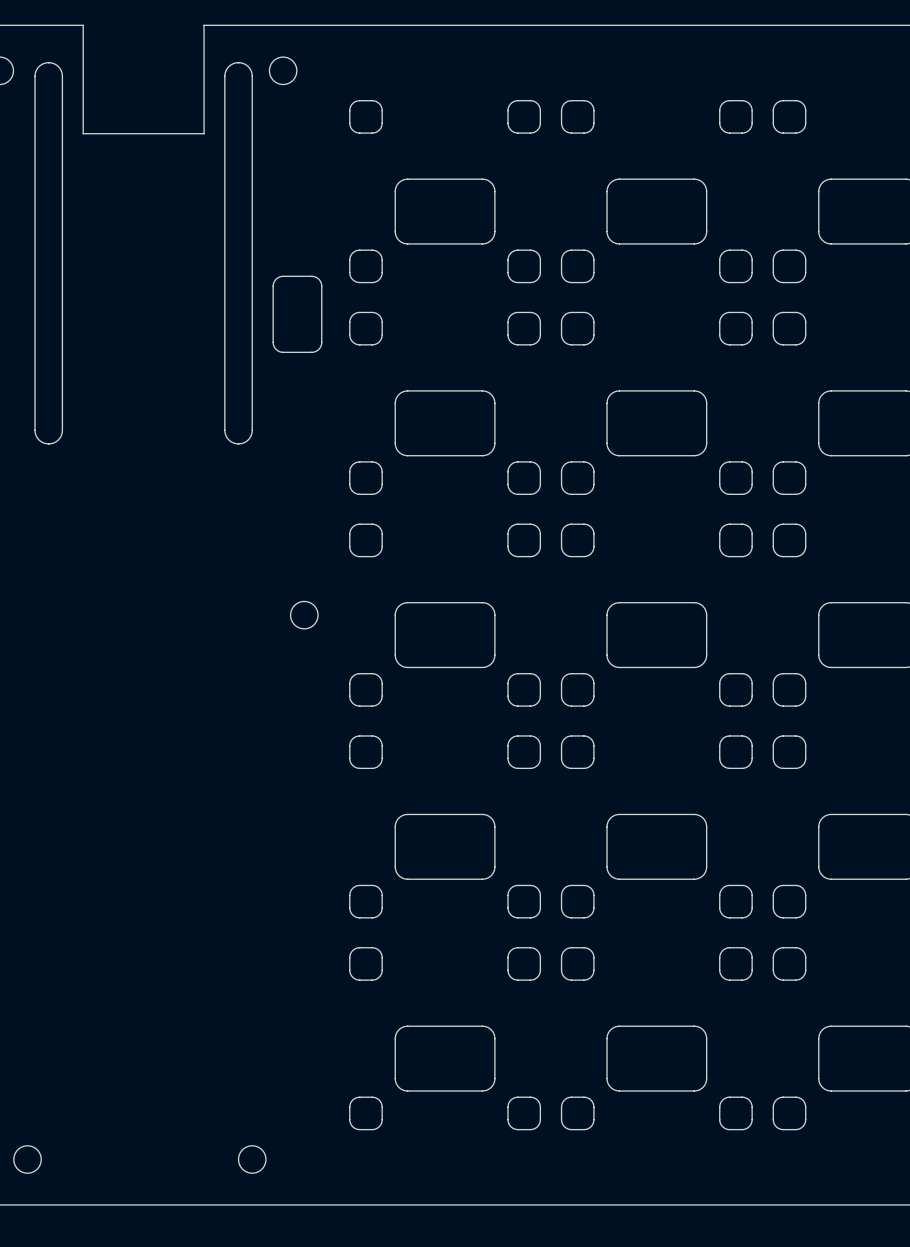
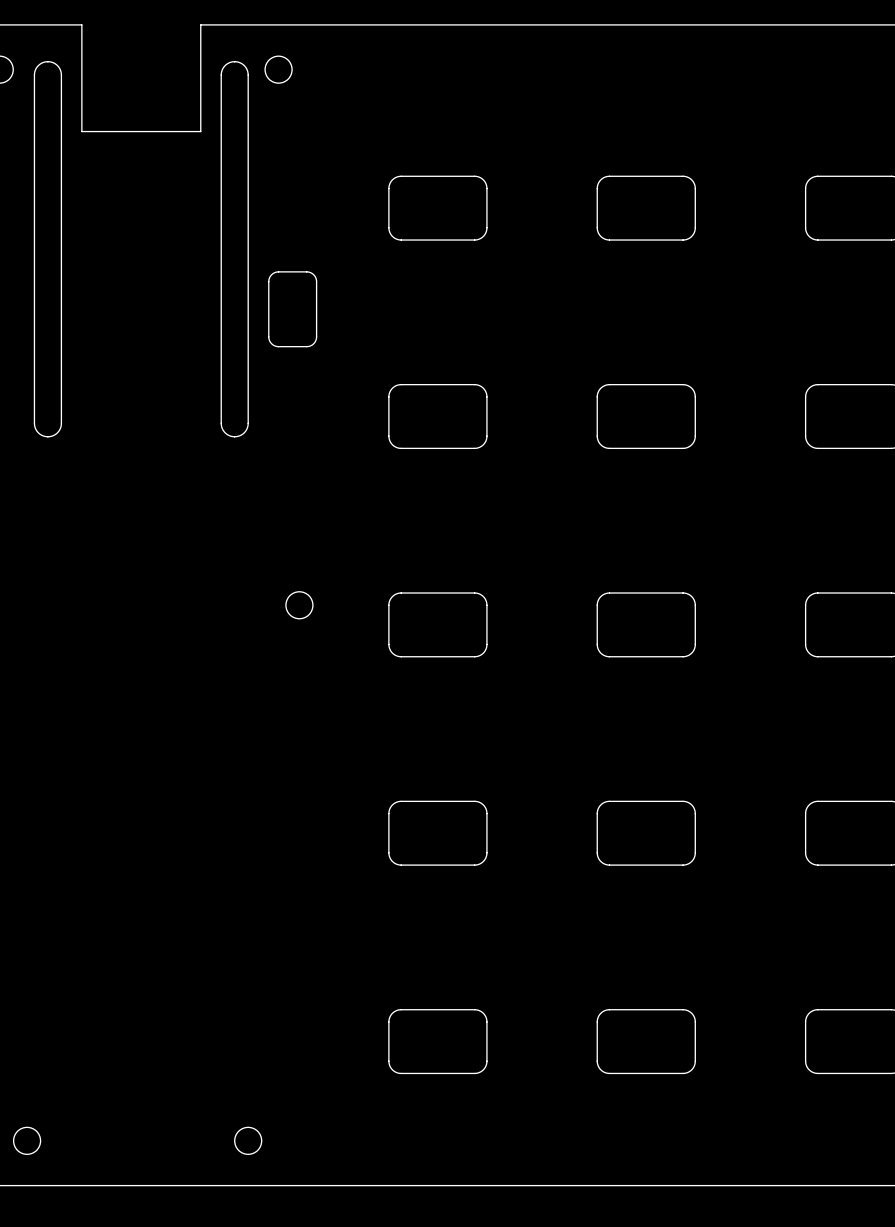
board edge: (359, 100) (374, 101) (380, 105) (382, 124) (377, 131) (358, 132) (351, 128) (350, 108) (353, 102) (359, 100) -> none
board edge: (517, 100) (532, 101) (539, 105) (540, 124) (535, 131) (516, 132) (509, 128) (508, 107) (512, 102) (517, 100) -> none
board edge: (571, 100) (586, 101) (592, 105) (593, 124) (588, 131) (570, 132) (562, 128) (561, 108) (565, 102) (571, 100) -> none
board edge: (729, 100) (744, 101) (750, 105) (752, 124) (747, 131) (728, 132) (721, 128) (720, 107) (723, 102) (729, 100) -> none
board edge: (783, 100) (798, 101) (804, 105) (805, 124) (800, 131) (781, 132) (774, 128) (773, 108) (777, 102) (783, 100) -> none
board edge: (359, 250) (374, 250) (380, 255) (382, 273) (377, 281) (358, 282) (351, 277) (350, 257) (353, 252) (359, 250) -> none
board edge: (517, 250) (532, 250) (539, 255) (540, 273) (535, 281) (516, 282) (509, 277) (508, 256) (512, 251) (517, 250) -> none
board edge: (571, 250) (586, 250) (592, 255) (593, 273) (588, 281) (570, 282) (562, 277) (561, 257) (565, 252) (571, 250) -> none
board edge: (729, 250) (744, 250) (750, 255) (752, 273) (747, 281) (728, 282) (721, 277) (720, 256) (723, 252) (729, 250) -> none
board edge: (783, 250) (798, 250) (804, 255) (805, 273) (800, 281) (781, 282) (774, 277) (773, 257) (777, 252) (783, 250) -> none
board edge: (359, 312) (374, 312) (380, 317) (382, 336) (377, 343) (358, 344) (351, 339) (350, 319) (353, 314) (359, 312) -> none
board edge: (517, 312) (532, 312) (539, 317) (540, 336) (535, 343) (516, 344) (509, 339) (508, 319) (512, 313) (517, 312) -> none
board edge: (571, 312) (586, 312) (592, 317) (593, 336) (588, 343) (570, 344) (562, 339) (561, 319) (565, 314) (571, 312) -> none
board edge: (729, 312) (744, 312) (750, 317) (752, 336) (747, 343) (728, 344) (721, 339) (720, 319) (724, 313) (729, 312) -> none
board edge: (783, 312) (798, 312) (804, 317) (805, 336) (800, 343) (781, 344) (774, 339) (773, 319) (777, 314) (783, 312) -> none
board edge: (359, 461) (374, 462) (380, 466) (382, 485) (377, 492) (358, 494) (351, 489) (350, 469) (353, 463) (359, 461) -> none
board edge: (517, 461) (532, 462) (539, 466) (540, 485) (535, 492) (516, 494) (509, 489) (508, 468) (512, 463) (517, 461) -> none
board edge: (571, 461) (586, 462) (592, 466) (593, 485) (588, 492) (570, 494) (563, 489) (561, 469) (565, 463) (571, 461) -> none
board edge: (729, 461) (744, 462) (750, 466) (752, 485) (747, 492) (728, 494) (721, 489) (720, 468) (724, 463) (729, 461) -> none
board edge: (783, 461) (798, 462) (804, 466) (805, 485) (800, 492) (782, 494) (774, 489) (773, 469) (777, 463) (783, 461) -> none
board edge: (359, 524) (374, 524) (380, 529) (382, 547) (377, 555) (358, 556) (351, 551) (350, 531) (353, 526) (359, 524) -> none
board edge: (517, 524) (532, 524) (539, 529) (540, 547) (535, 555) (516, 556) (509, 551) (508, 530) (512, 525) (517, 524) -> none
board edge: (571, 524) (586, 524) (592, 529) (593, 547) (588, 555) (570, 556) (563, 551) (561, 531) (565, 526) (571, 524) -> none
board edge: (729, 524) (744, 524) (750, 529) (752, 547) (747, 555) (728, 556) (721, 551) (720, 530) (723, 526) (729, 524) -> none
board edge: (783, 524) (798, 524) (804, 529) (805, 547) (800, 555) (782, 556) (774, 551) (773, 531) (777, 526) (783, 524) -> none
board edge: (359, 673) (374, 674) (380, 678) (382, 697) (377, 704) (358, 706) (351, 701) (350, 681) (353, 675) (359, 673) -> none
board edge: (517, 673) (532, 674) (539, 678) (540, 697) (535, 704) (516, 706) (509, 701) (508, 680) (511, 675) (517, 673) -> none
board edge: (571, 673) (586, 674) (592, 678) (593, 697) (588, 704) (570, 706) (563, 701) (561, 681) (565, 675) (571, 673) -> none
board edge: (729, 673) (744, 674) (750, 678) (752, 697) (747, 704) (728, 706) (721, 701) (720, 680) (723, 675) (729, 673) -> none
board edge: (783, 673) (798, 674) (804, 678) (805, 697) (800, 704) (782, 706) (774, 701) (773, 681) (777, 675) (783, 673) -> none
board edge: (359, 735) (374, 736) (380, 740) (382, 759) (377, 767) (358, 768) (351, 763) (350, 743) (353, 738) (359, 735) -> none
board edge: (517, 735) (532, 736) (539, 740) (540, 759) (535, 767) (516, 768) (509, 763) (508, 742) (512, 737) (517, 735) -> none
board edge: (571, 735) (586, 736) (592, 740) (593, 759) (588, 767) (570, 768) (563, 763) (561, 743) (565, 738) (571, 735) -> none
board edge: (729, 735) (744, 736) (750, 740) (752, 759) (747, 767) (728, 768) (721, 763) (720, 742) (724, 737) (729, 735) -> none
board edge: (783, 735) (798, 736) (804, 740) (805, 759) (800, 767) (782, 768) (774, 763) (773, 743) (777, 738) (783, 735) -> none
board edge: (359, 885) (374, 885) (380, 890) (382, 909) (377, 916) (358, 917) (351, 912) (350, 892) (353, 887) (359, 885) -> none
board edge: (517, 885) (532, 885) (539, 890) (540, 909) (535, 916) (516, 917) (509, 912) (508, 892) (512, 886) (517, 885) -> none
board edge: (571, 885) (586, 885) (592, 890) (593, 909) (588, 916) (570, 917) (562, 912) (561, 892) (565, 887) (571, 885) -> none
board edge: (729, 885) (744, 885) (750, 890) (752, 909) (747, 916) (728, 917) (721, 912) (720, 892) (723, 887) (729, 885) -> none
board edge: (783, 885) (798, 885) (804, 890) (805, 909) (800, 916) (781, 917) (774, 912) (773, 892) (777, 887) (783, 885) -> none
board edge: (359, 947) (374, 948) (380, 952) (382, 971) (377, 978) (358, 980) (351, 975) (350, 955) (353, 949) (359, 947) -> none
board edge: (517, 947) (532, 948) (539, 952) (540, 971) (535, 978) (516, 980) (509, 975) (508, 954) (512, 949) (517, 947) -> none
board edge: (571, 947) (586, 948) (592, 952) (593, 971) (588, 978) (570, 980) (562, 975) (561, 955) (565, 949) (571, 947) -> none
board edge: (729, 947) (744, 948) (750, 952) (752, 971) (747, 978) (728, 980) (721, 975) (720, 954) (724, 949) (729, 947) -> none
board edge: (783, 947) (798, 948) (804, 952) (805, 971) (800, 978) (781, 980) (774, 975) (773, 955) (777, 949) (783, 947) -> none
board edge: (359, 1097) (374, 1097) (380, 1102) (382, 1120) (377, 1128) (358, 1129) (351, 1124) (350, 1104) (353, 1099) (359, 1097) -> none
board edge: (517, 1097) (532, 1097) (539, 1102) (540, 1120) (535, 1128) (516, 1129) (509, 1124) (508, 1103) (512, 1098) (517, 1097) -> none
board edge: (571, 1097) (586, 1097) (592, 1102) (593, 1120) (588, 1128) (570, 1129) (562, 1124) (561, 1104) (565, 1099) (571, 1097) -> none
board edge: (729, 1097) (744, 1097) (750, 1102) (752, 1120) (747, 1128) (728, 1129) (721, 1124) (720, 1103) (724, 1098) (729, 1097) -> none
board edge: (783, 1097) (798, 1097) (804, 1102) (805, 1120) (800, 1128) (781, 1129) (774, 1124) (773, 1104) (777, 1099) (783, 1097) -> none

